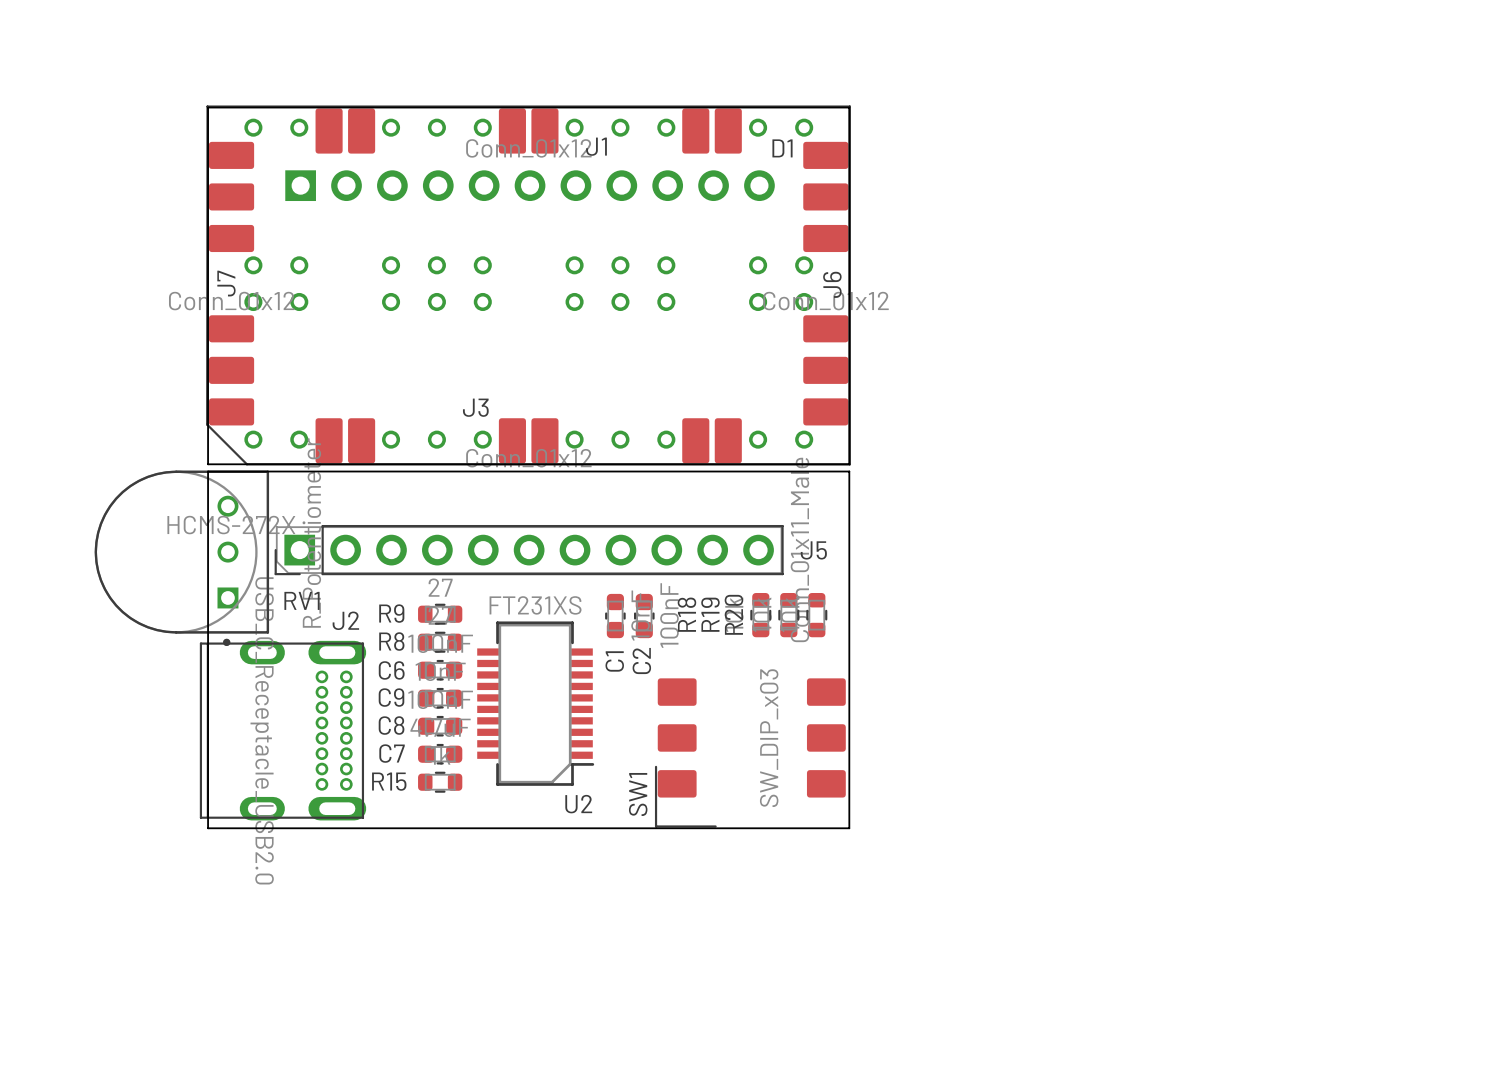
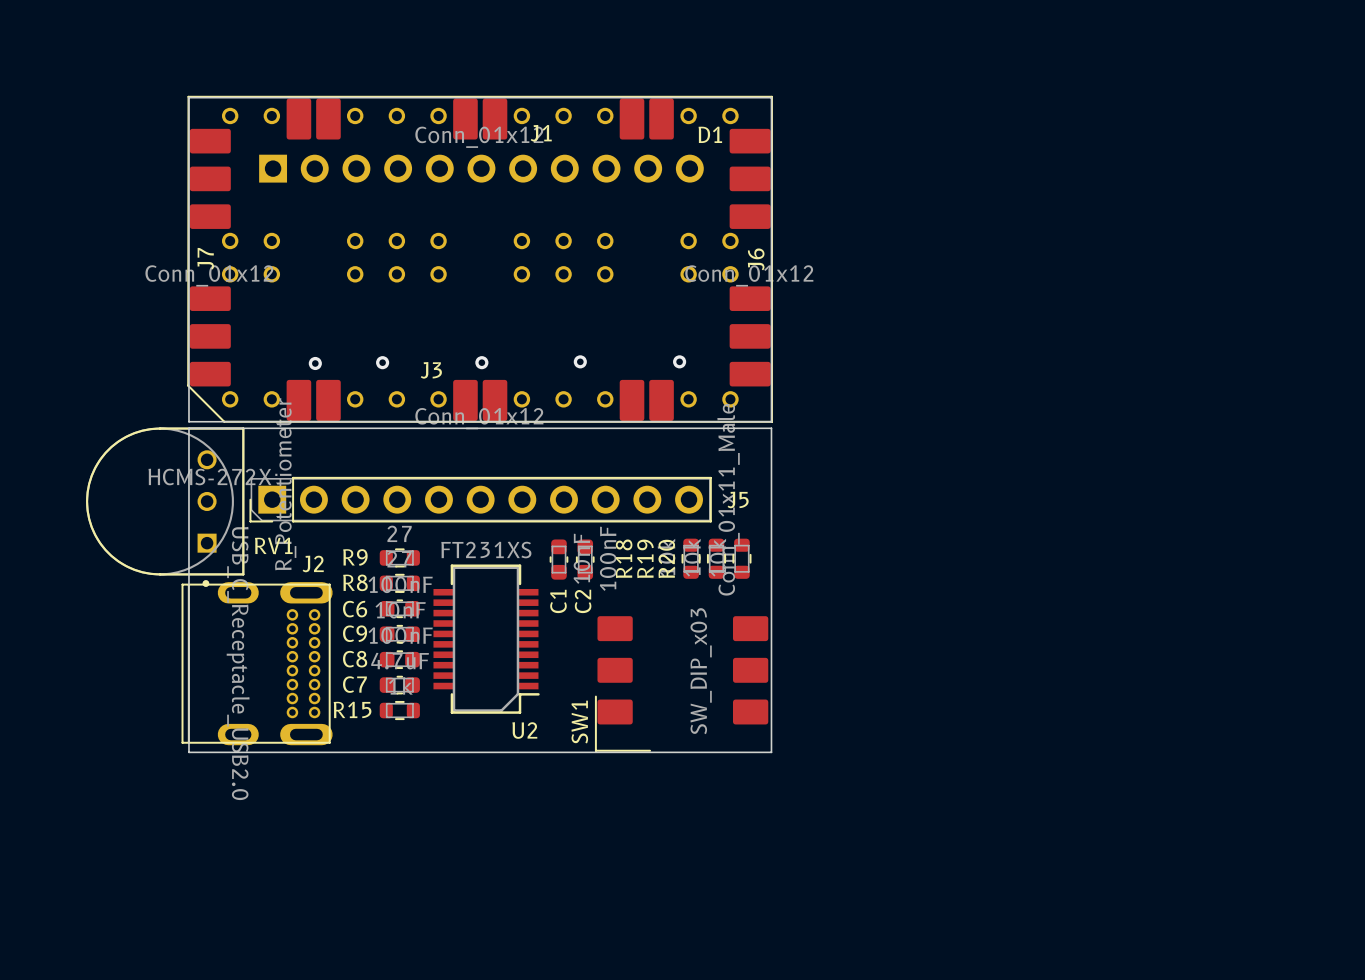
via: none -> (580, 361)
via: none -> (679, 361)
via: none -> (382, 362)
via: none -> (481, 362)
via: none -> (315, 363)

